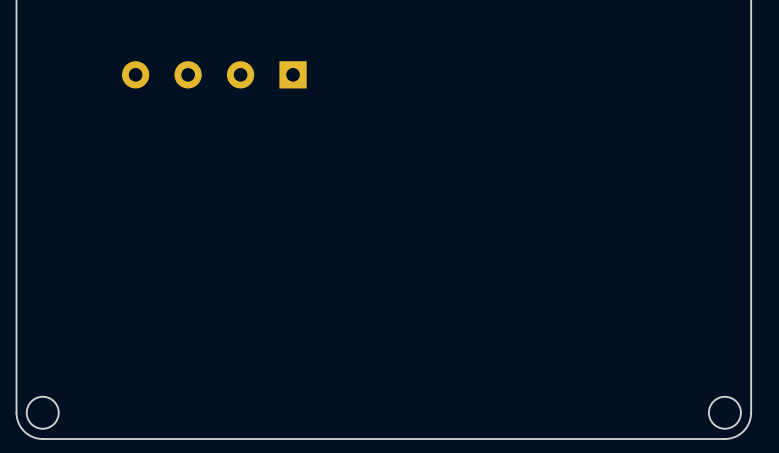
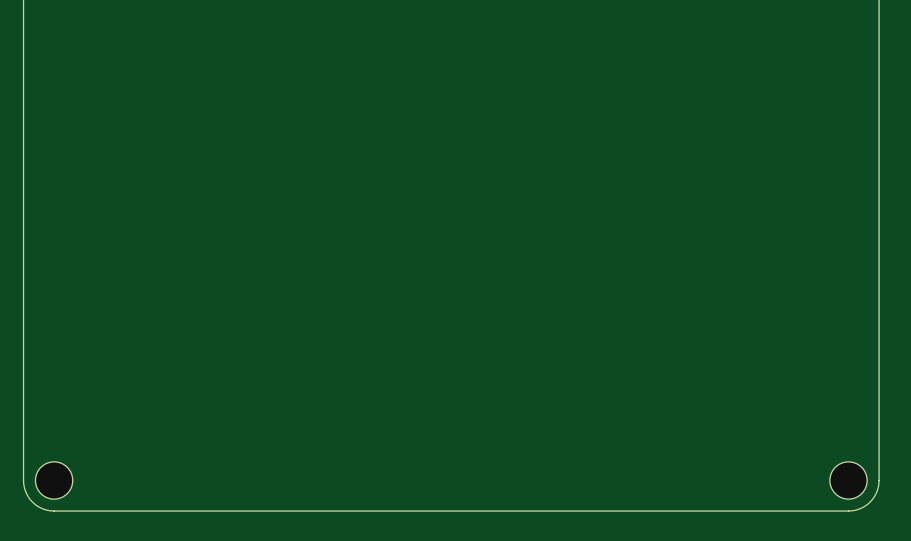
part: (214, 74) -> none

